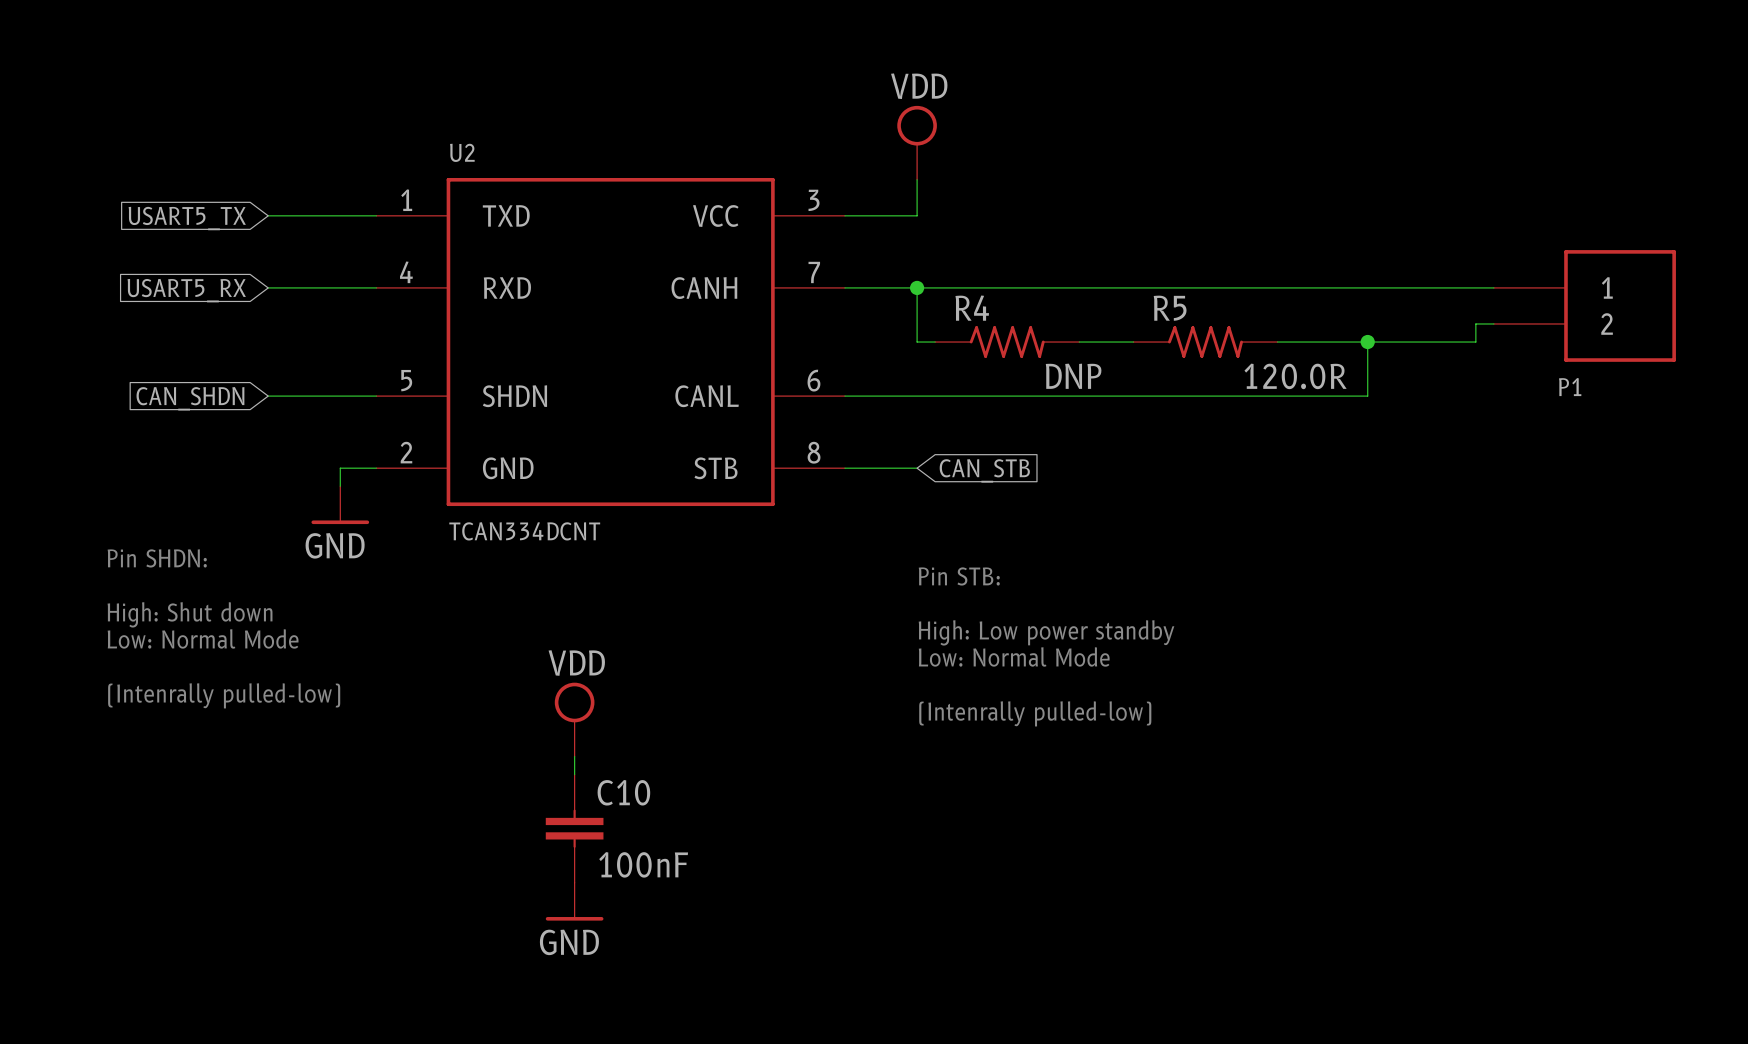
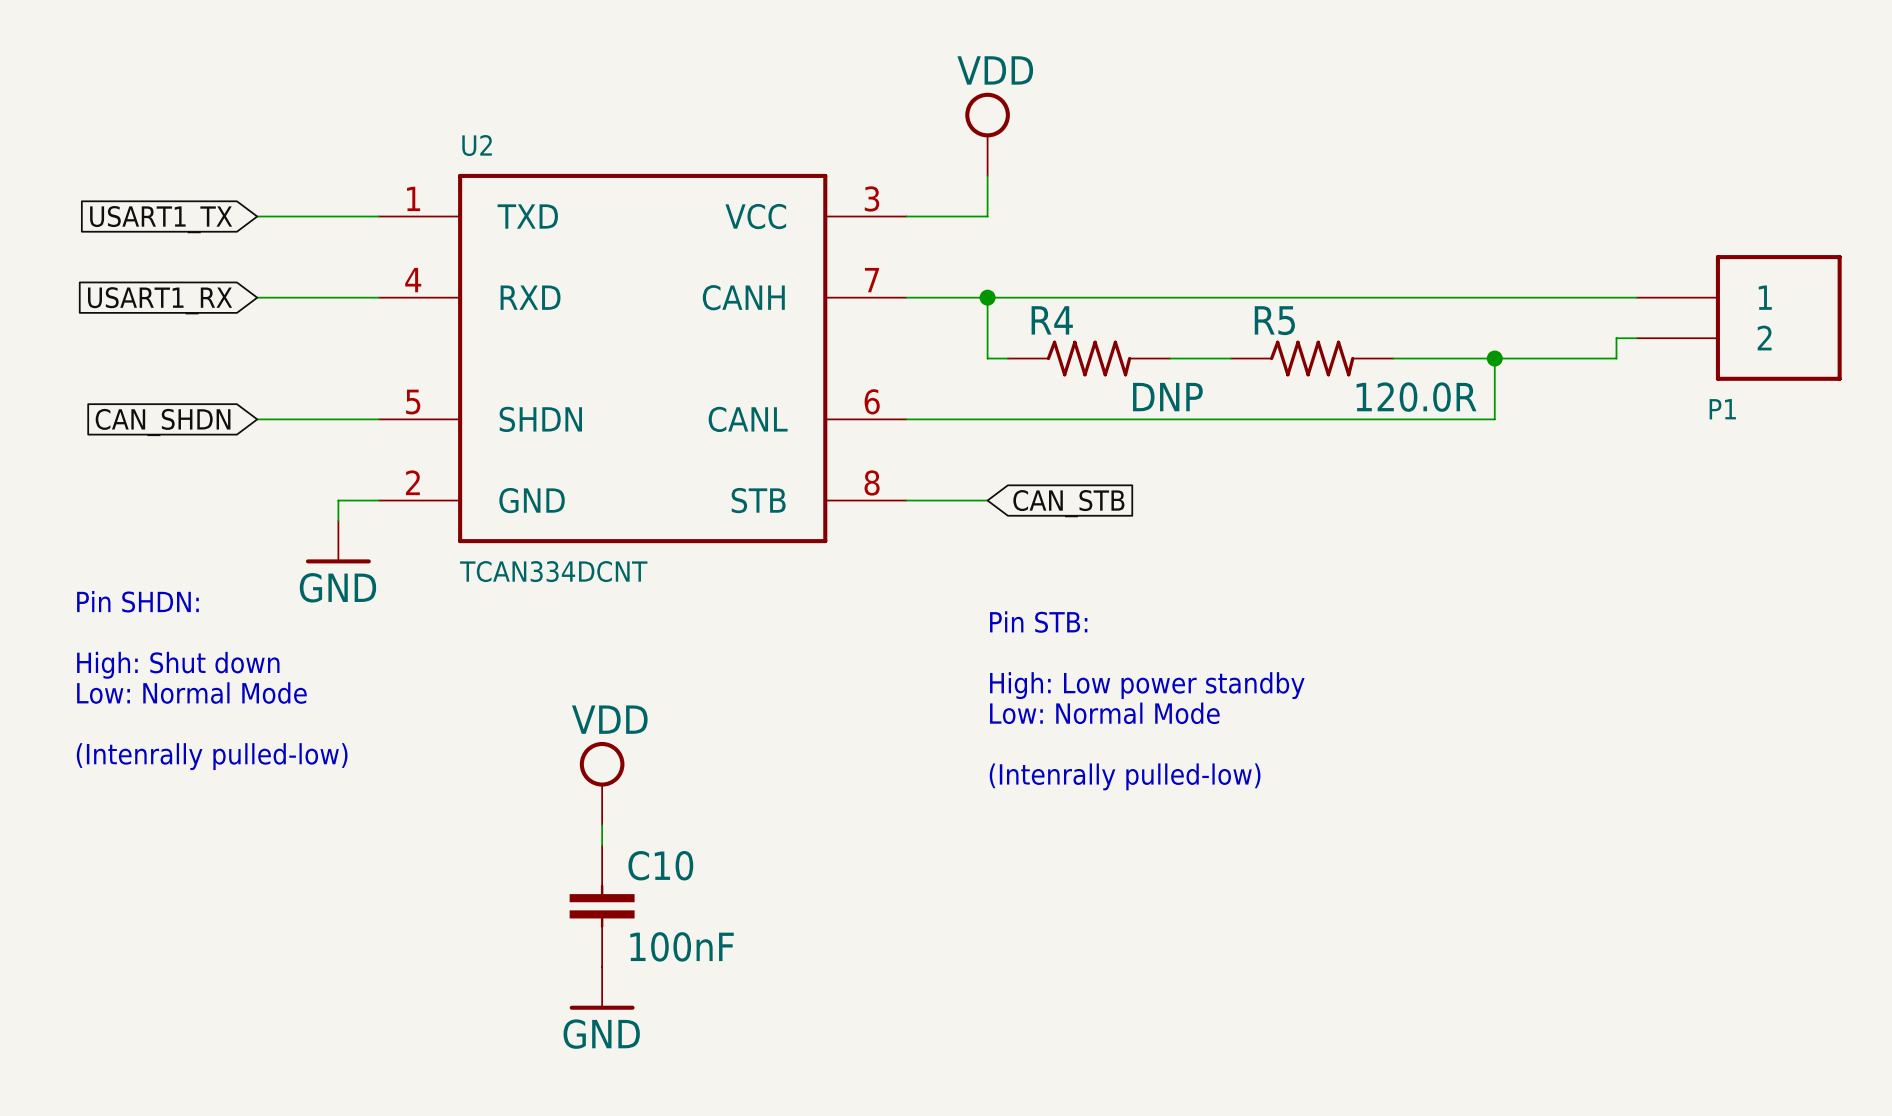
global label: USART5_TX (187, 218) -> USART1_TX (161, 219)
global label: USART5_RX (186, 290) -> USART1_RX (160, 300)

